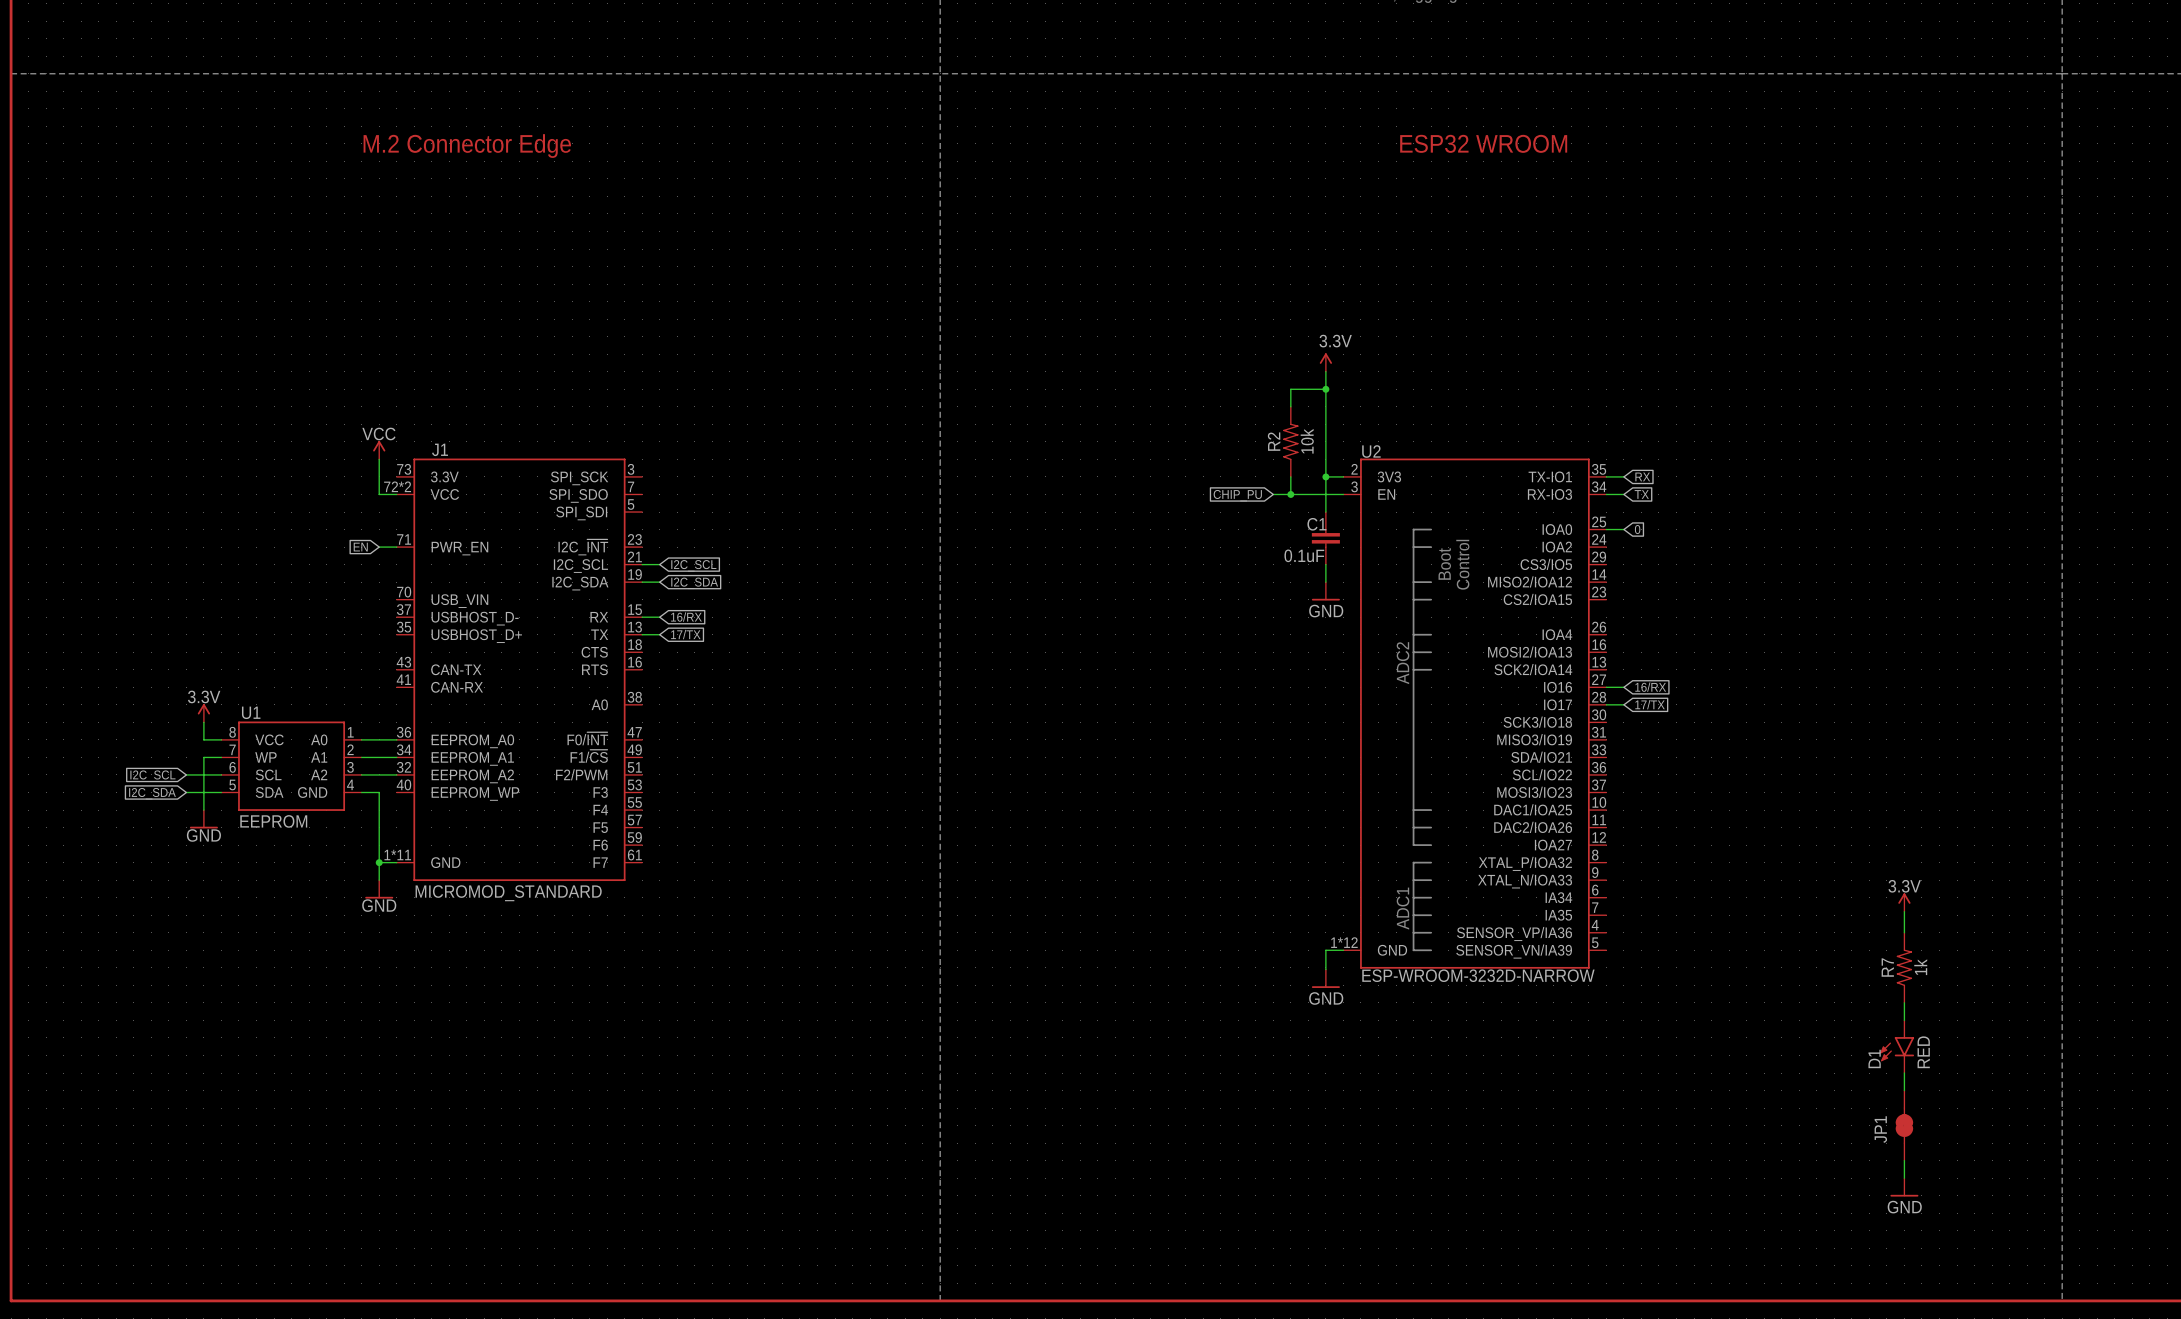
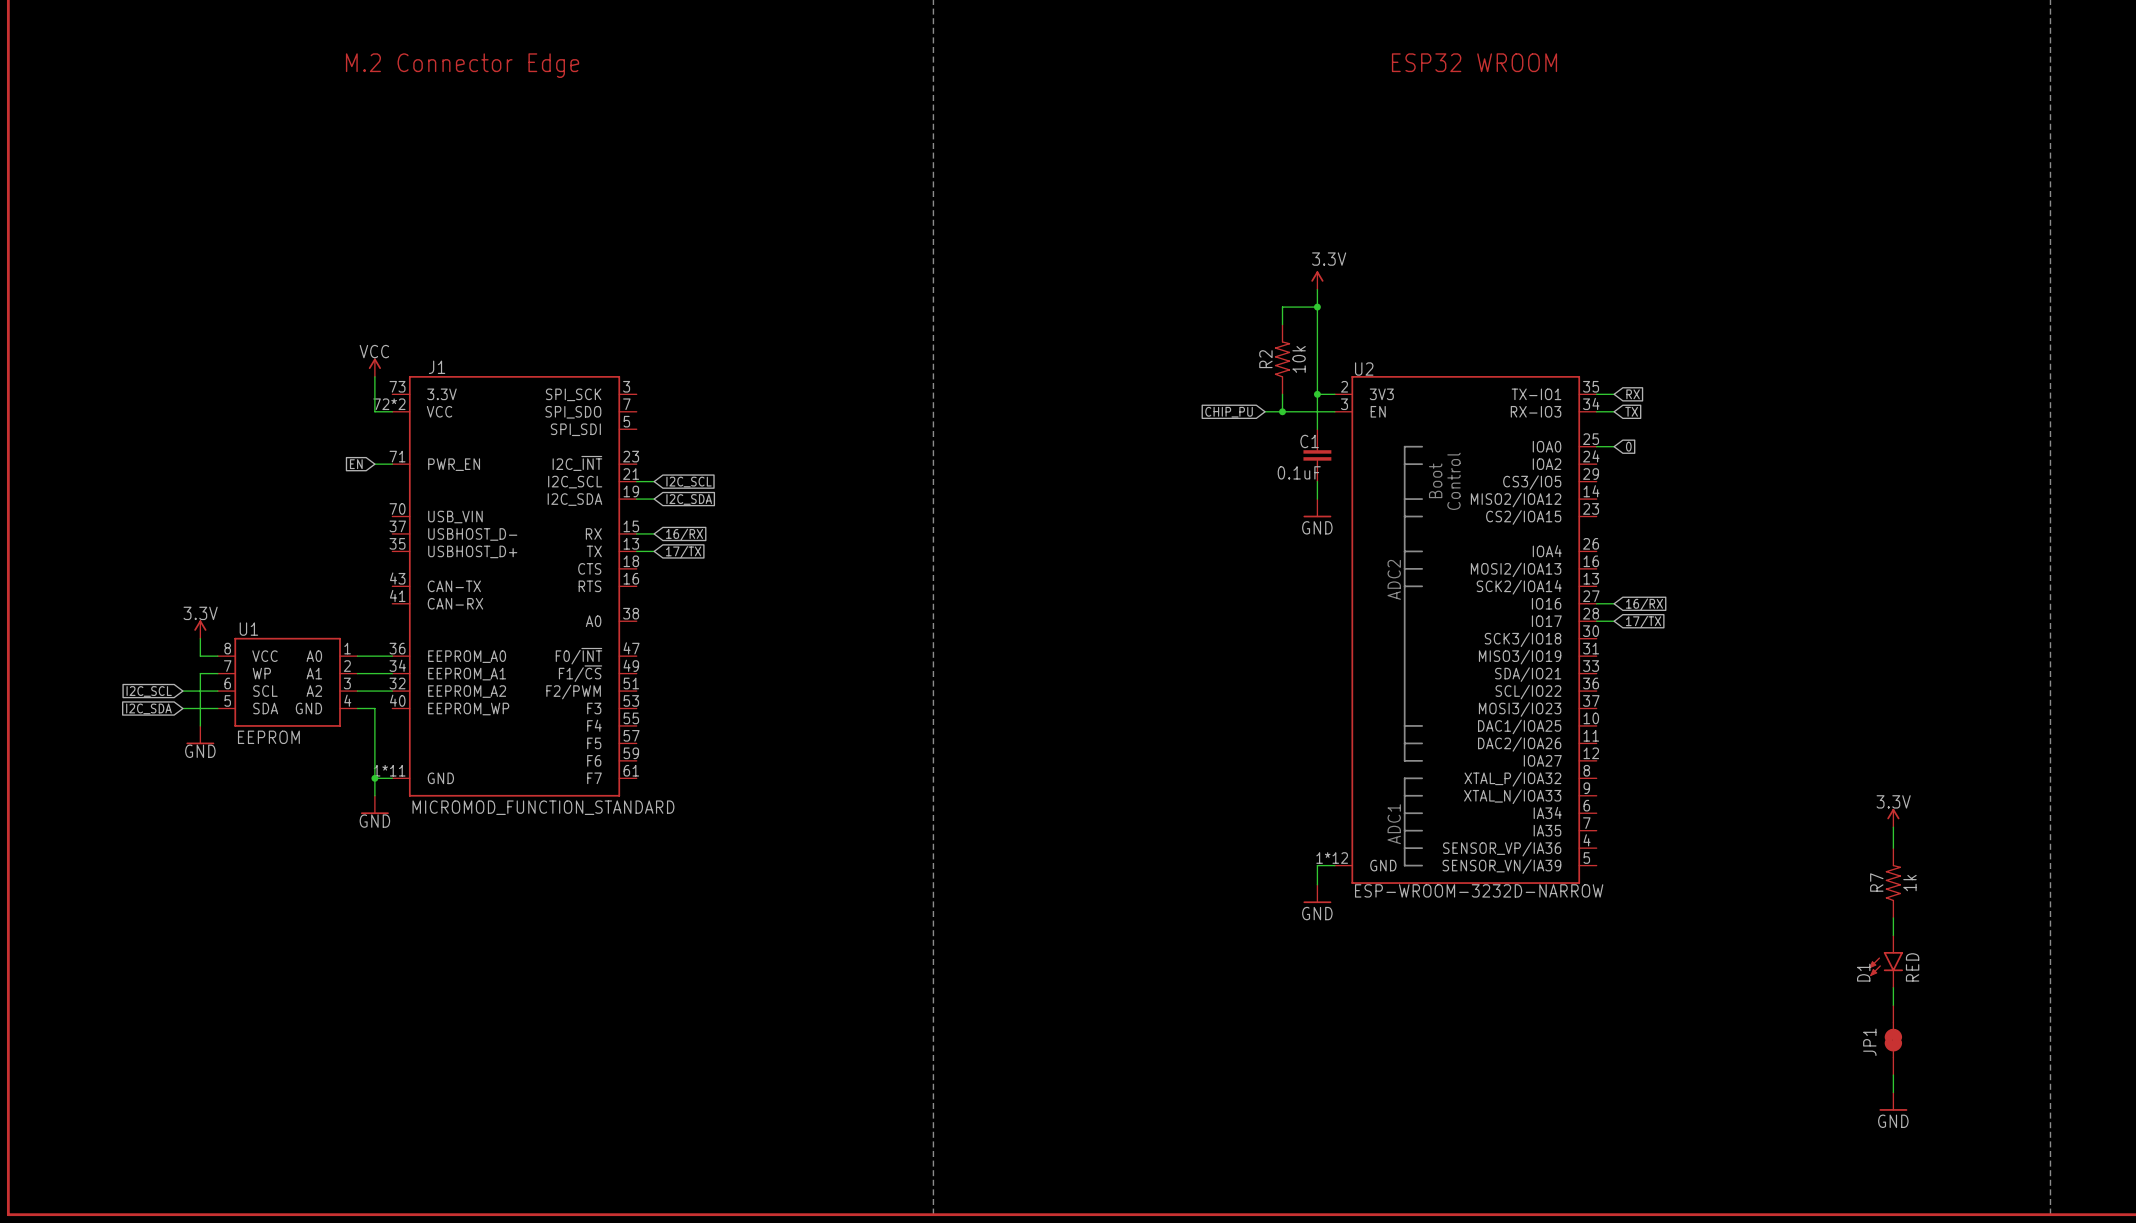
J1 value: MICROMOD_STANDARD (508, 893) -> MICROMOD_FUNCTION_STANDARD (543, 807)

